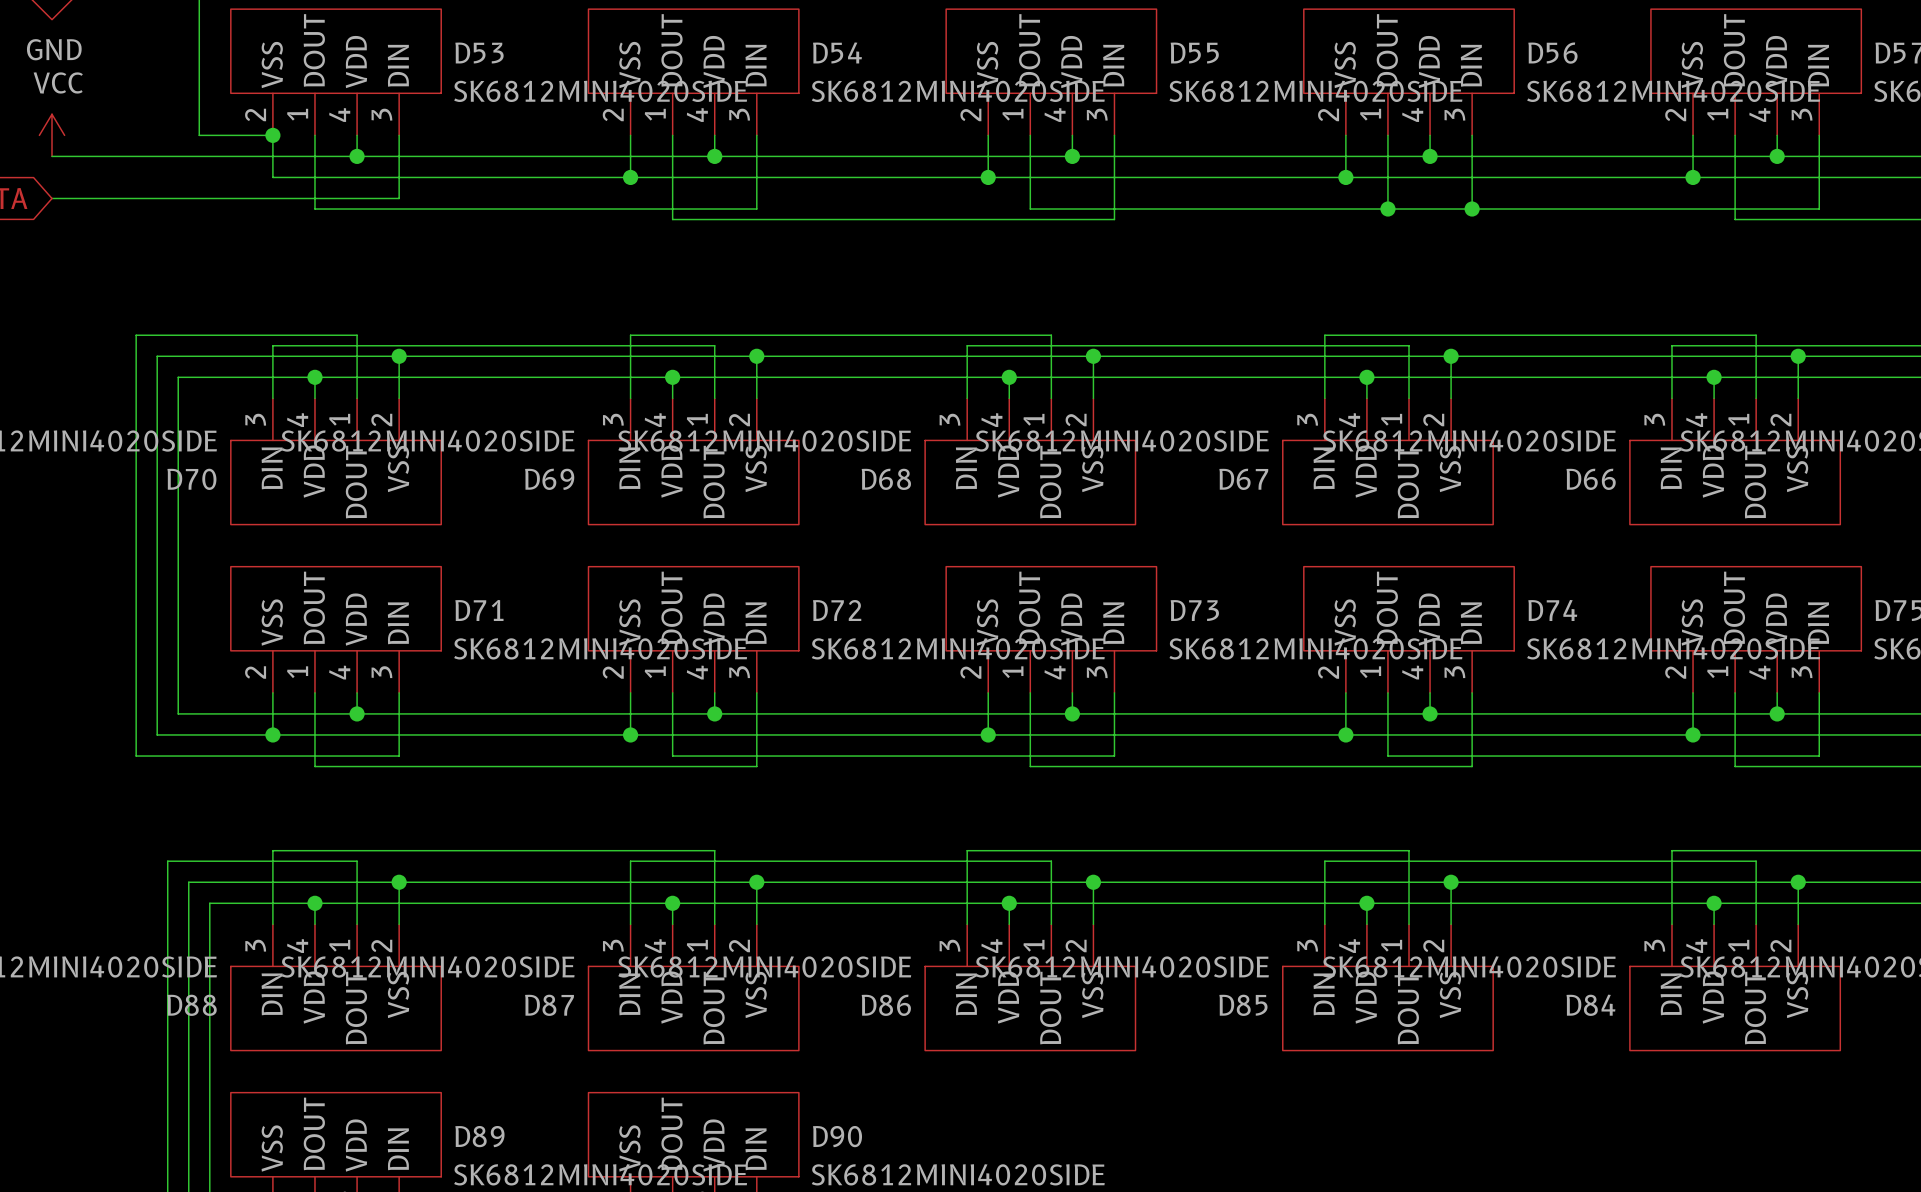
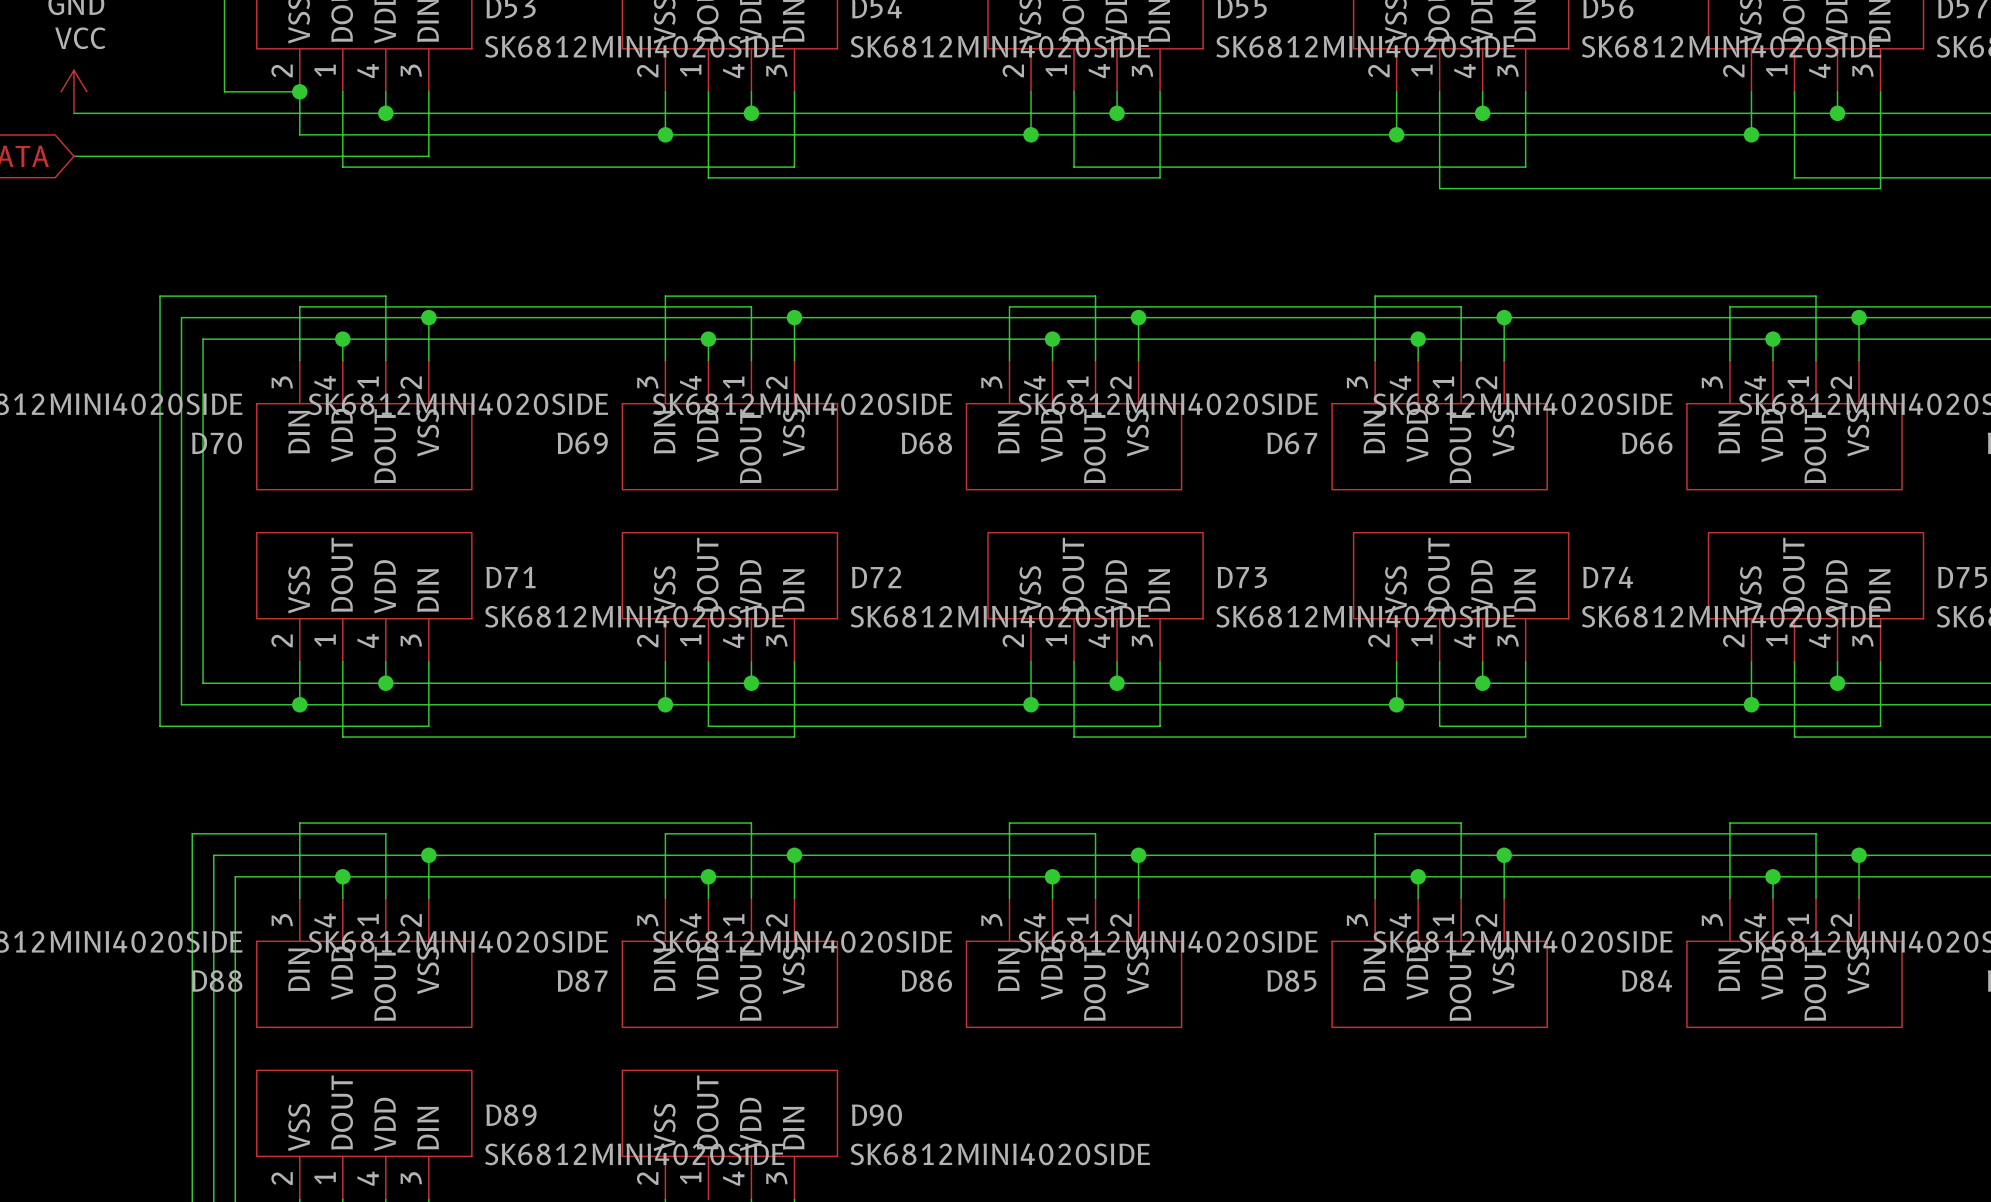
junction: (1387, 209) -> none
wire: (1472, 209) (1819, 209) -> (1439, 167) (1439, 188) (1880, 188) (1880, 167)
junction: (1472, 209) -> none

